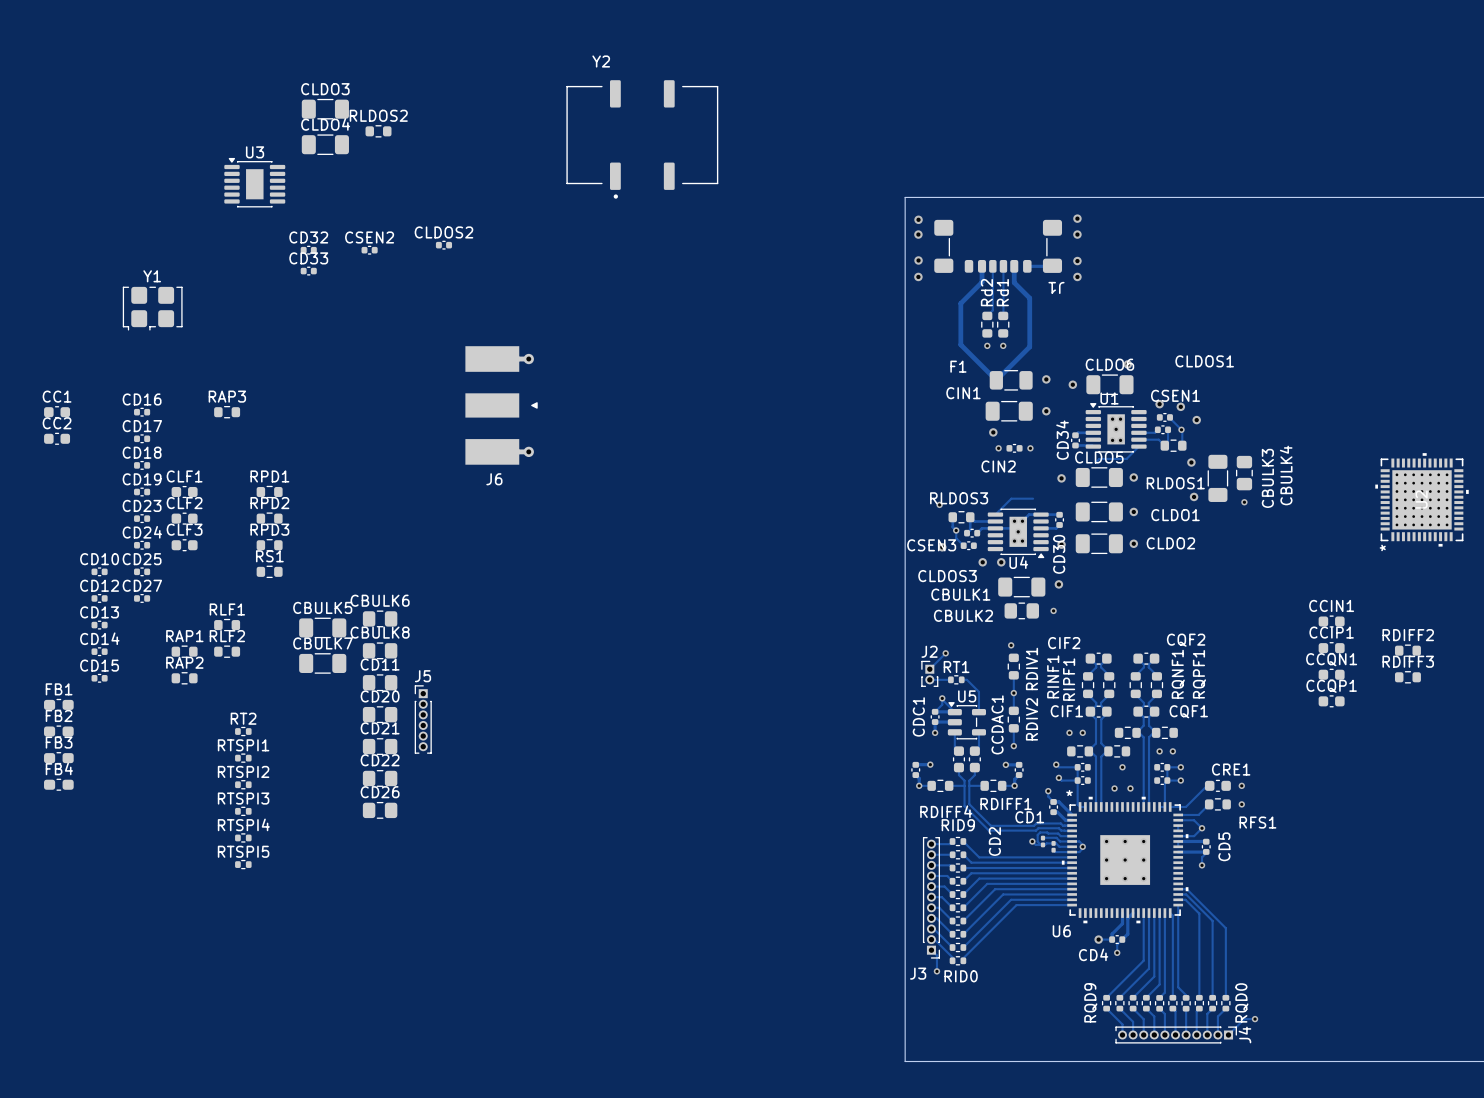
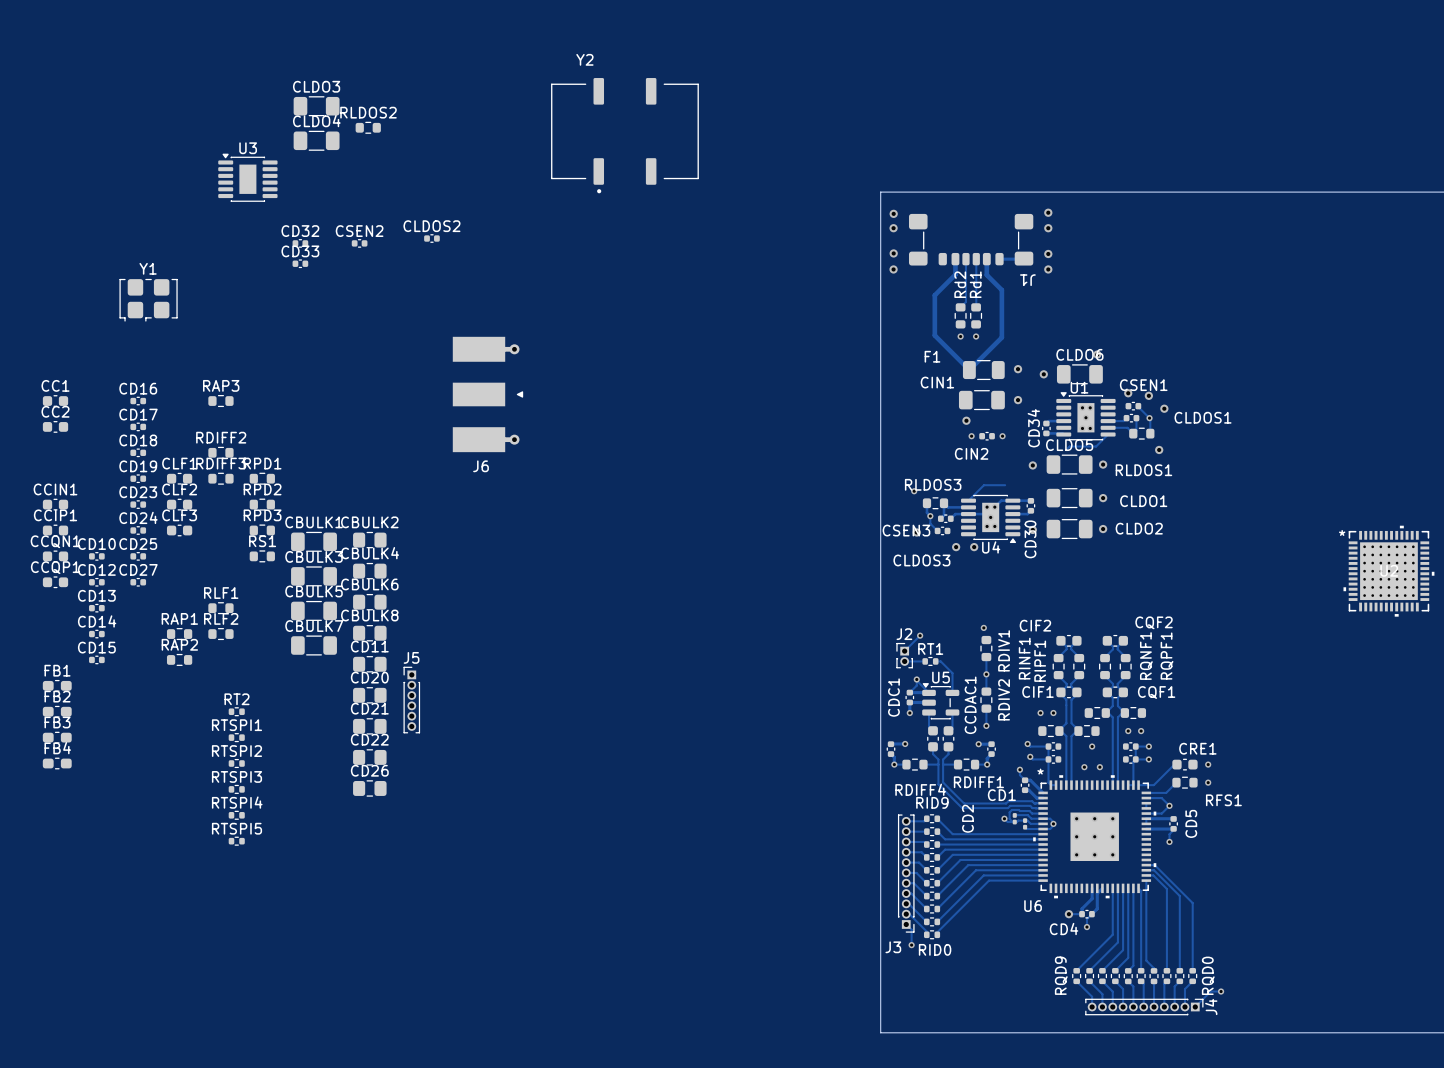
CLDOS1 name position: CLDOS1 (1204, 361) -> CLDOS1 (1203, 417)
CBULK4 rotation: 0° (1244, 473) -> 90° clockwise (369, 571)
CBULK4 position: (1244, 473) -> (369, 571)
CBULK4 name position: CBULK4 (1286, 475) -> CBULK4 (370, 553)
CBULK3 rotation: 0° (1217, 478) -> 90° clockwise (314, 576)
CBULK3 position: (1217, 478) -> (314, 576)
CBULK3 name position: CBULK3 (1267, 478) -> CBULK3 (314, 556)
via: (1194, 496) -> none
part rotation: 0° (1422, 499) -> 90° clockwise (1388, 571)
part position: (1422, 499) -> (1388, 571)
via: (1244, 502) -> none
via: (1058, 584) -> none
CBULK1 position: (1021, 587) -> (314, 541)
CBULK1 name position: CBULK1 (960, 594) -> CBULK1 (314, 522)
CBULK2 position: (1021, 610) -> (369, 540)
via: (1053, 610) -> none
CBULK2 name position: CBULK2 (963, 615) -> CBULK2 (369, 522)
CCIN1 position: (1331, 621) -> (55, 504)
CCIP1 position: (1331, 648) -> (55, 530)
RDIFF2 position: (1407, 650) -> (220, 452)
CCQN1 position: (1331, 674) -> (55, 556)
RDIFF3 position: (1407, 677) -> (220, 478)
CCQP1 position: (1331, 701) -> (55, 582)

